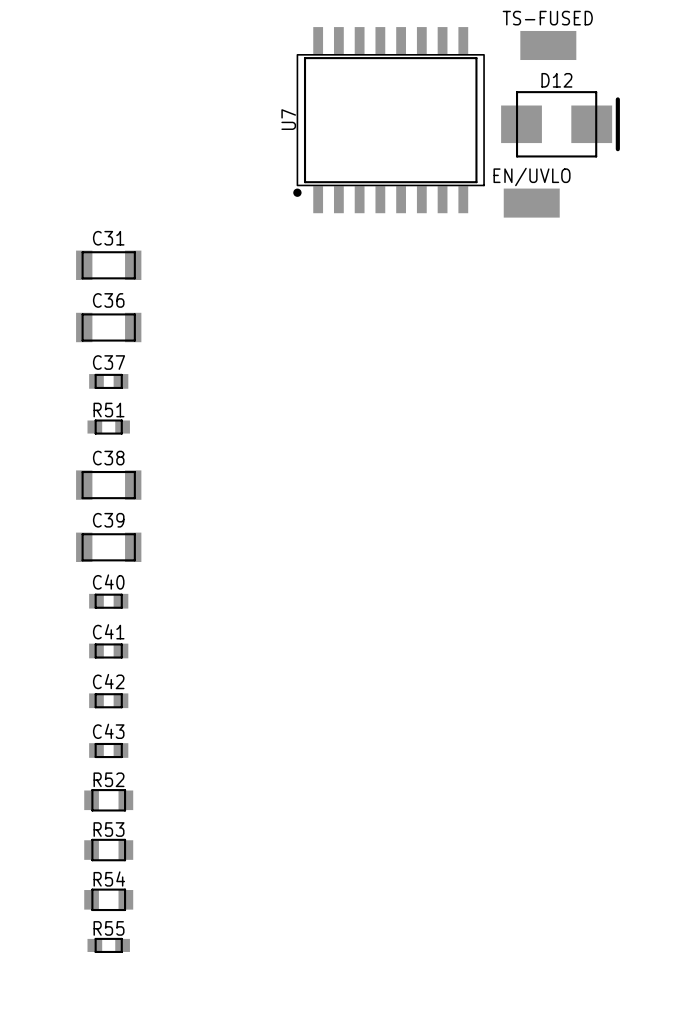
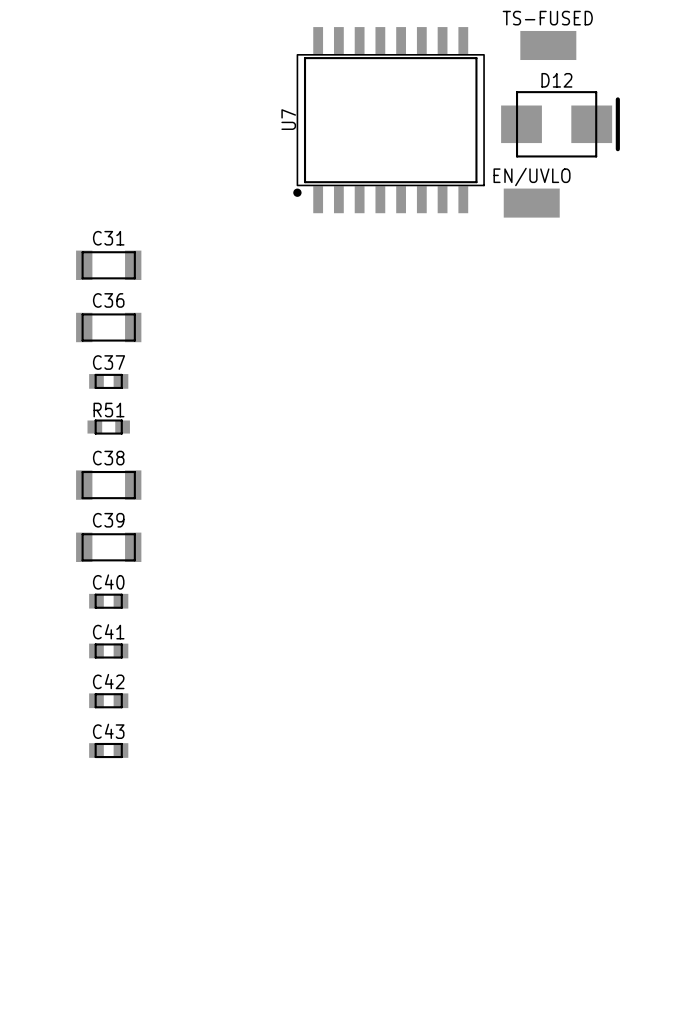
R52: (108, 800) -> none
R53: (108, 850) -> none
R54: (108, 899) -> none
R55: (108, 945) -> none

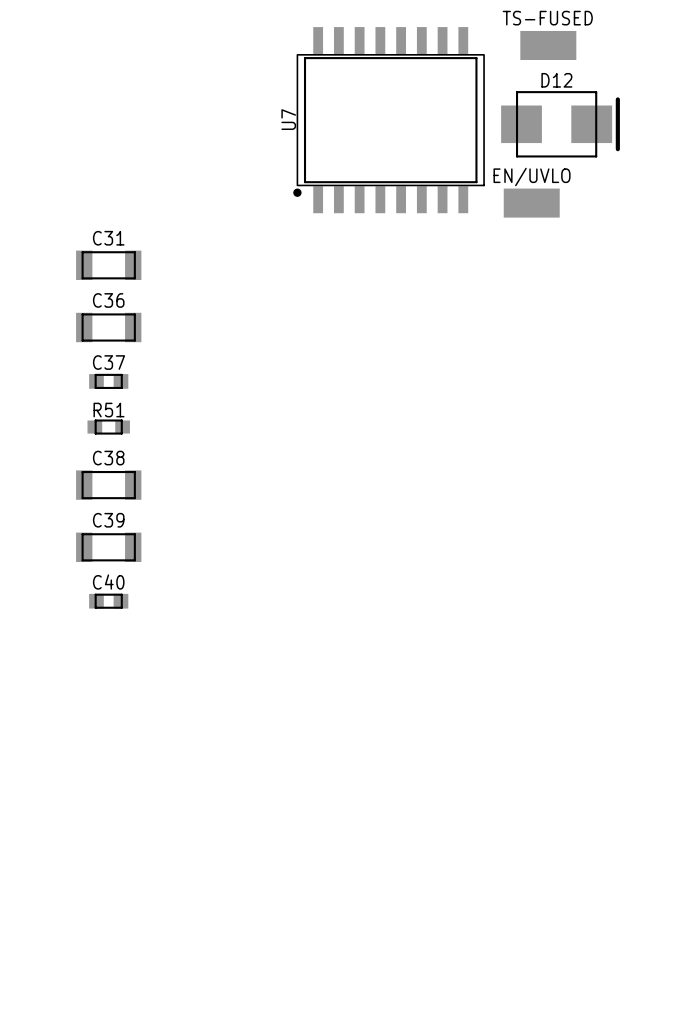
C41: (108, 650) -> none
C42: (108, 700) -> none
C43: (108, 750) -> none

